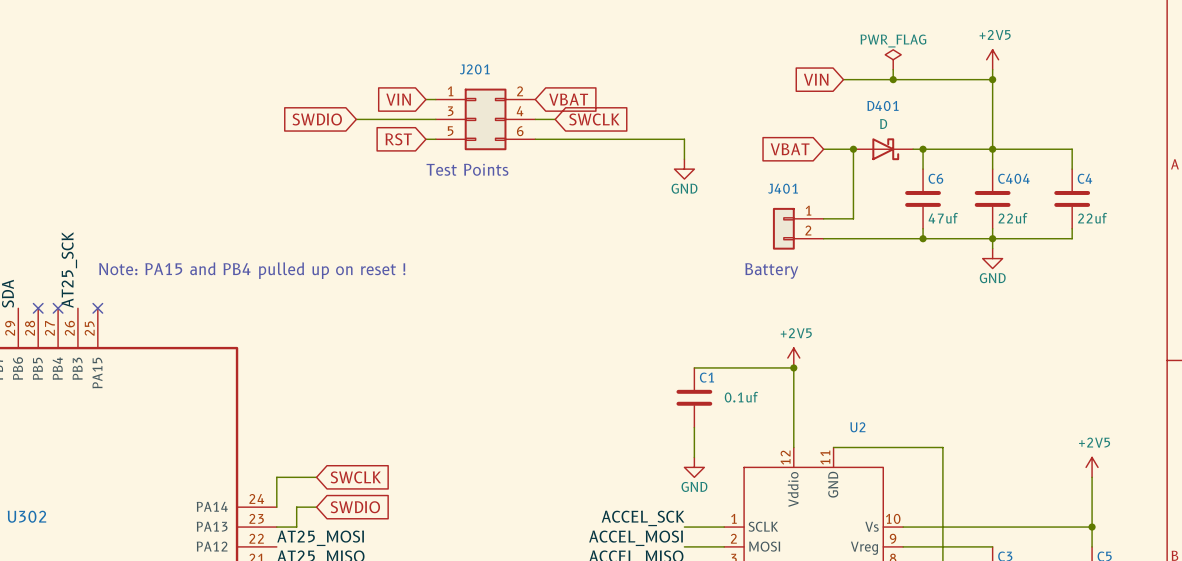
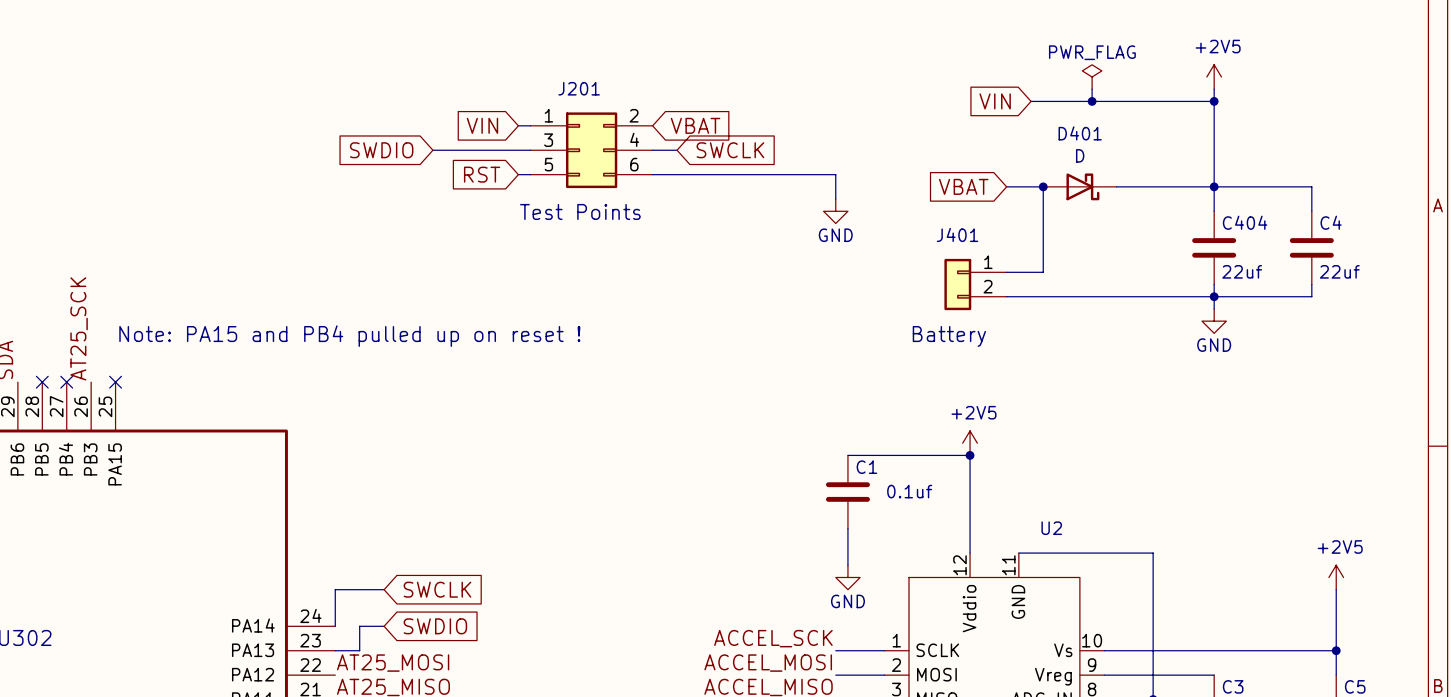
wire: (923, 149) (923, 169) -> none
junction: (923, 149) -> none
C6: 47uf (923, 198) -> none
wire: (923, 228) (923, 238) -> none
junction: (923, 238) -> none

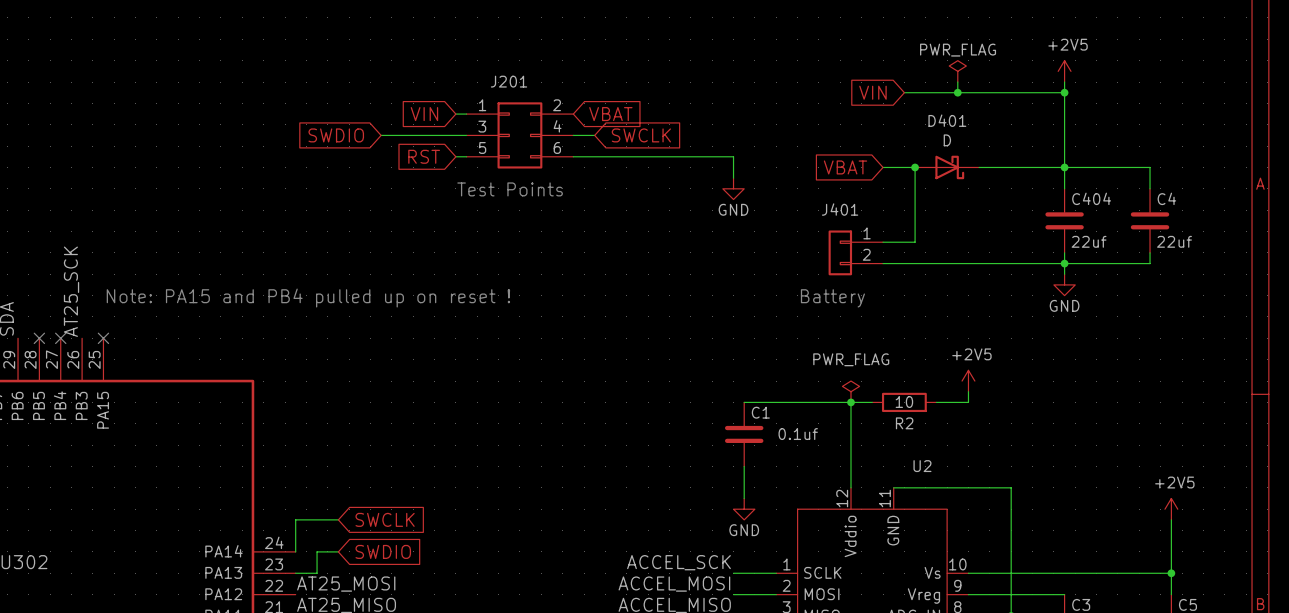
power symbol: none -> +2V5 (968, 381)
power symbol: +2V5 (970, 443) -> PWR_FLAG (851, 391)
wire: none -> (968, 391) (968, 402) (936, 402)
wire: none -> (851, 402) (872, 402)
R2: none -> 10 (904, 402)

